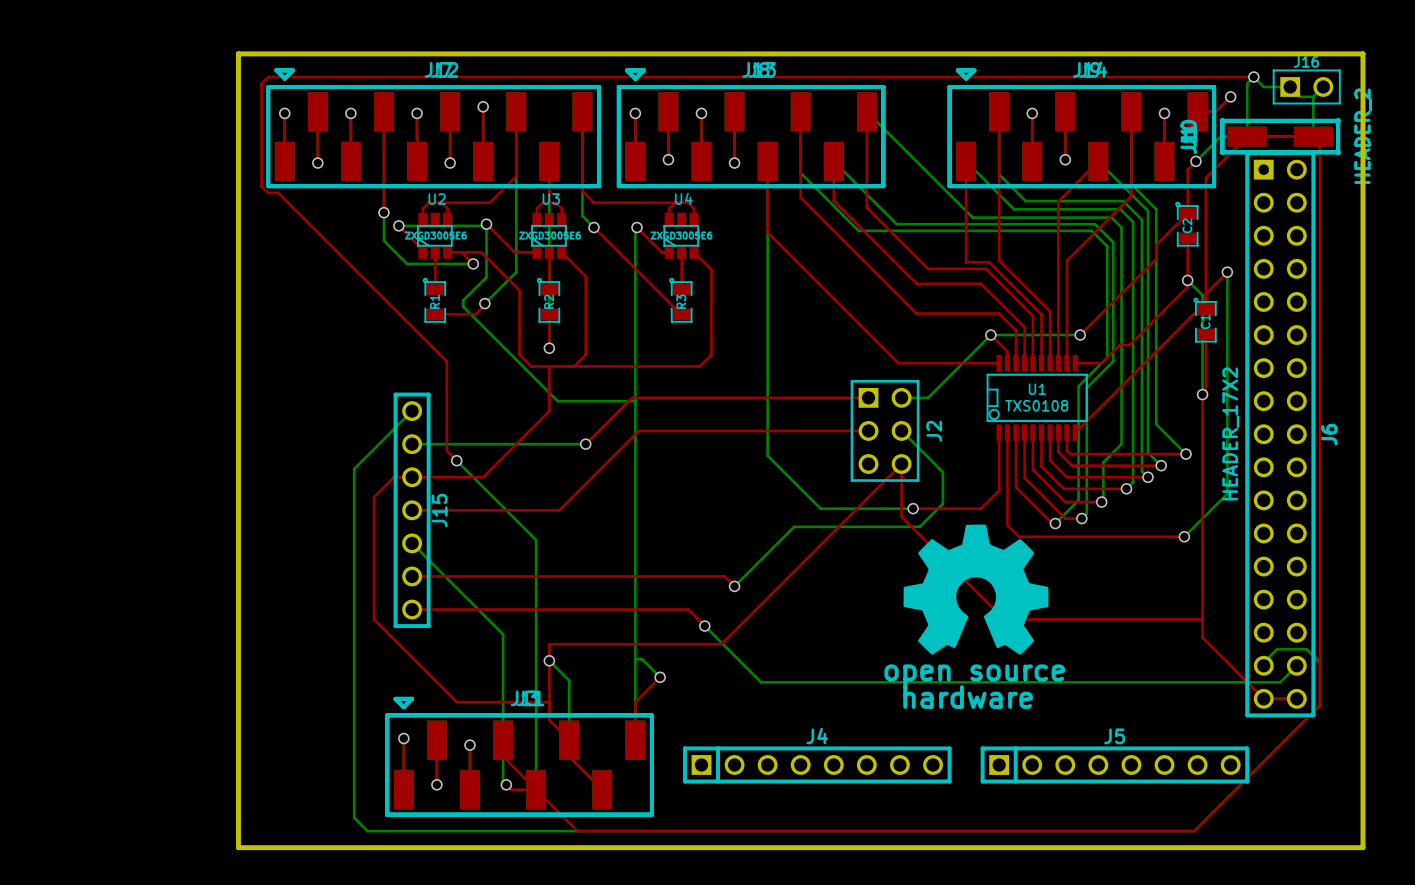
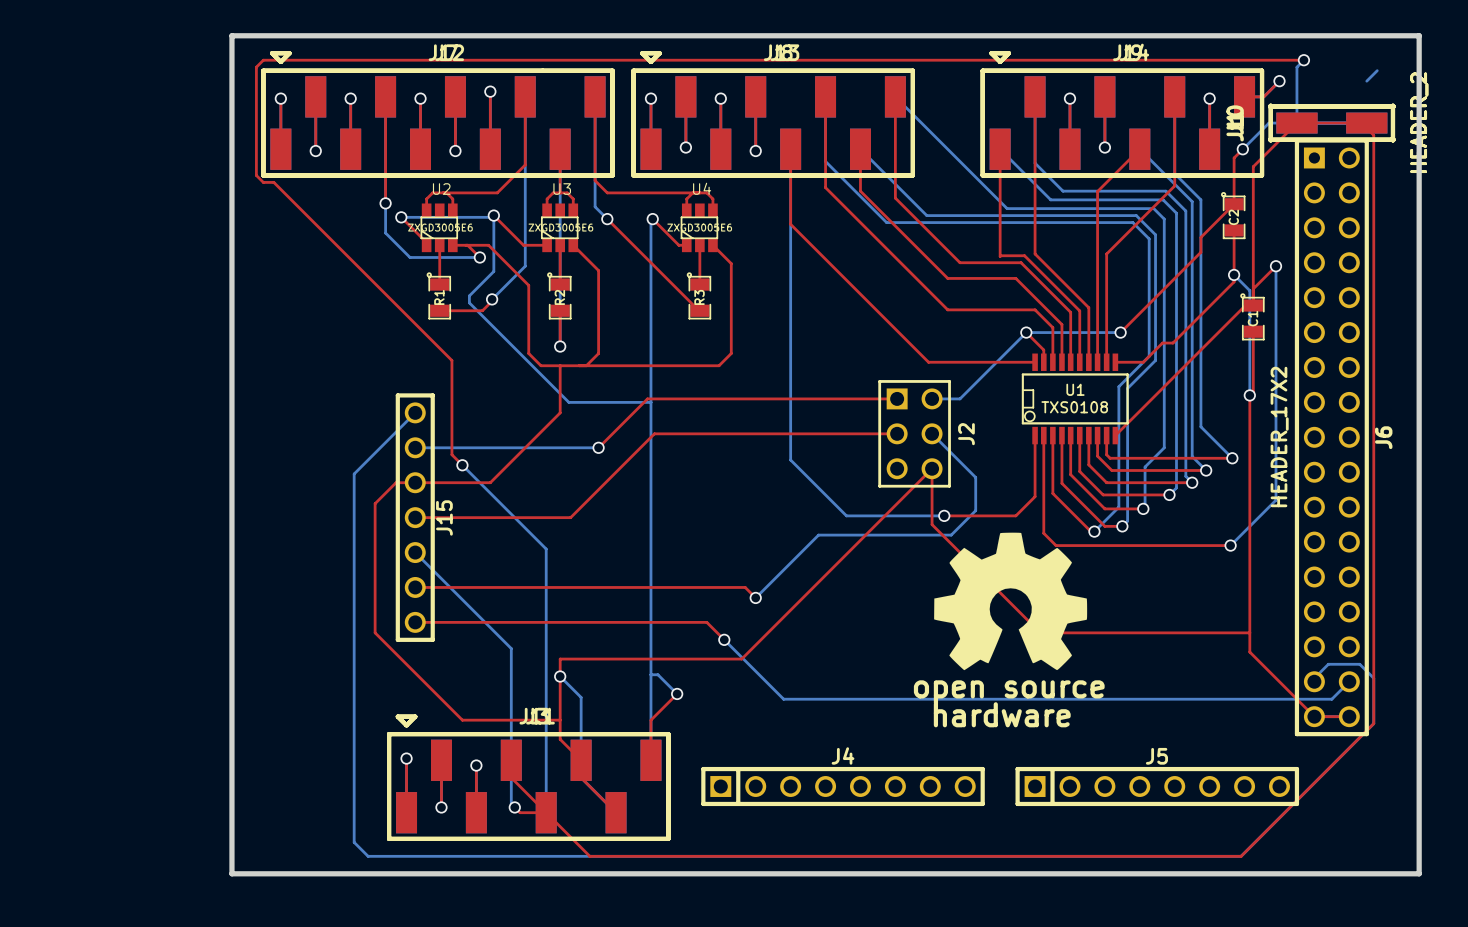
bottom track: (1253, 77) (1263, 86) (1290, 86) (1300, 96) (1313, 96) (1313, 136) -> none
J16: (1306, 86) -> none

